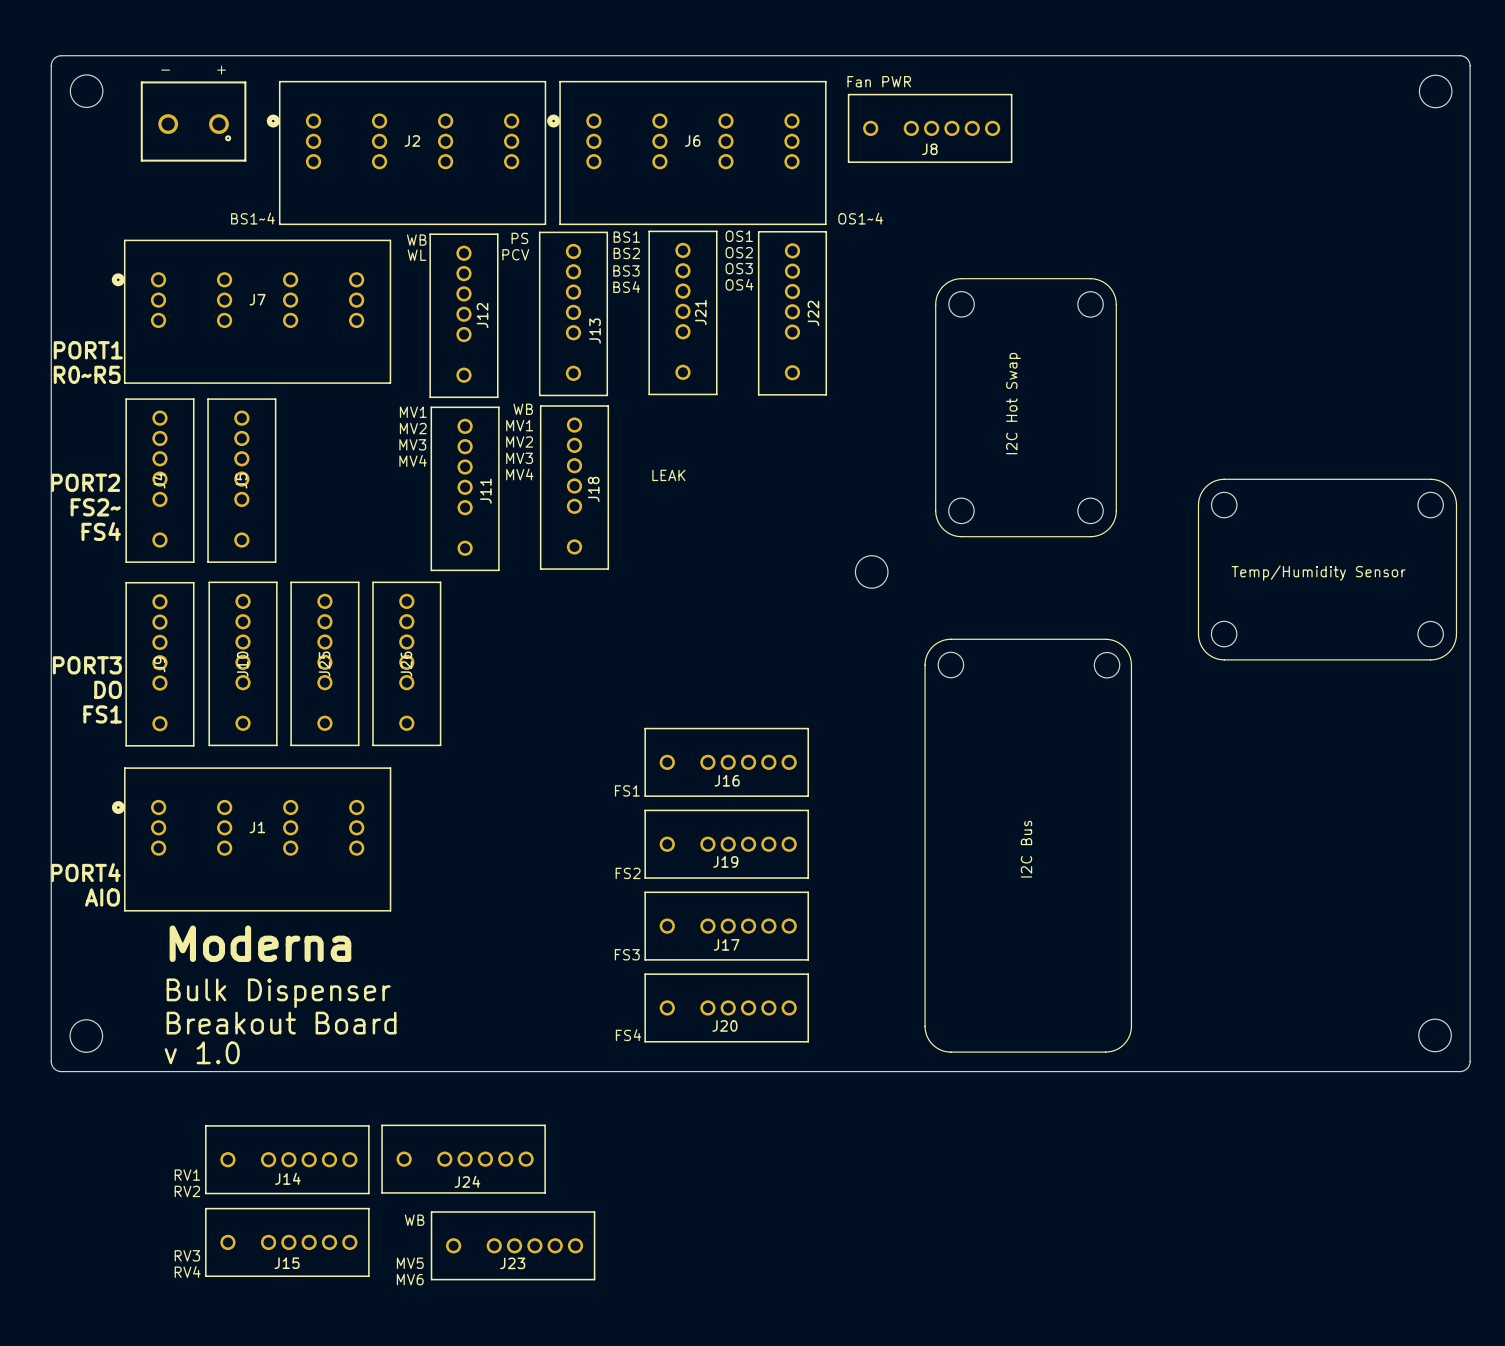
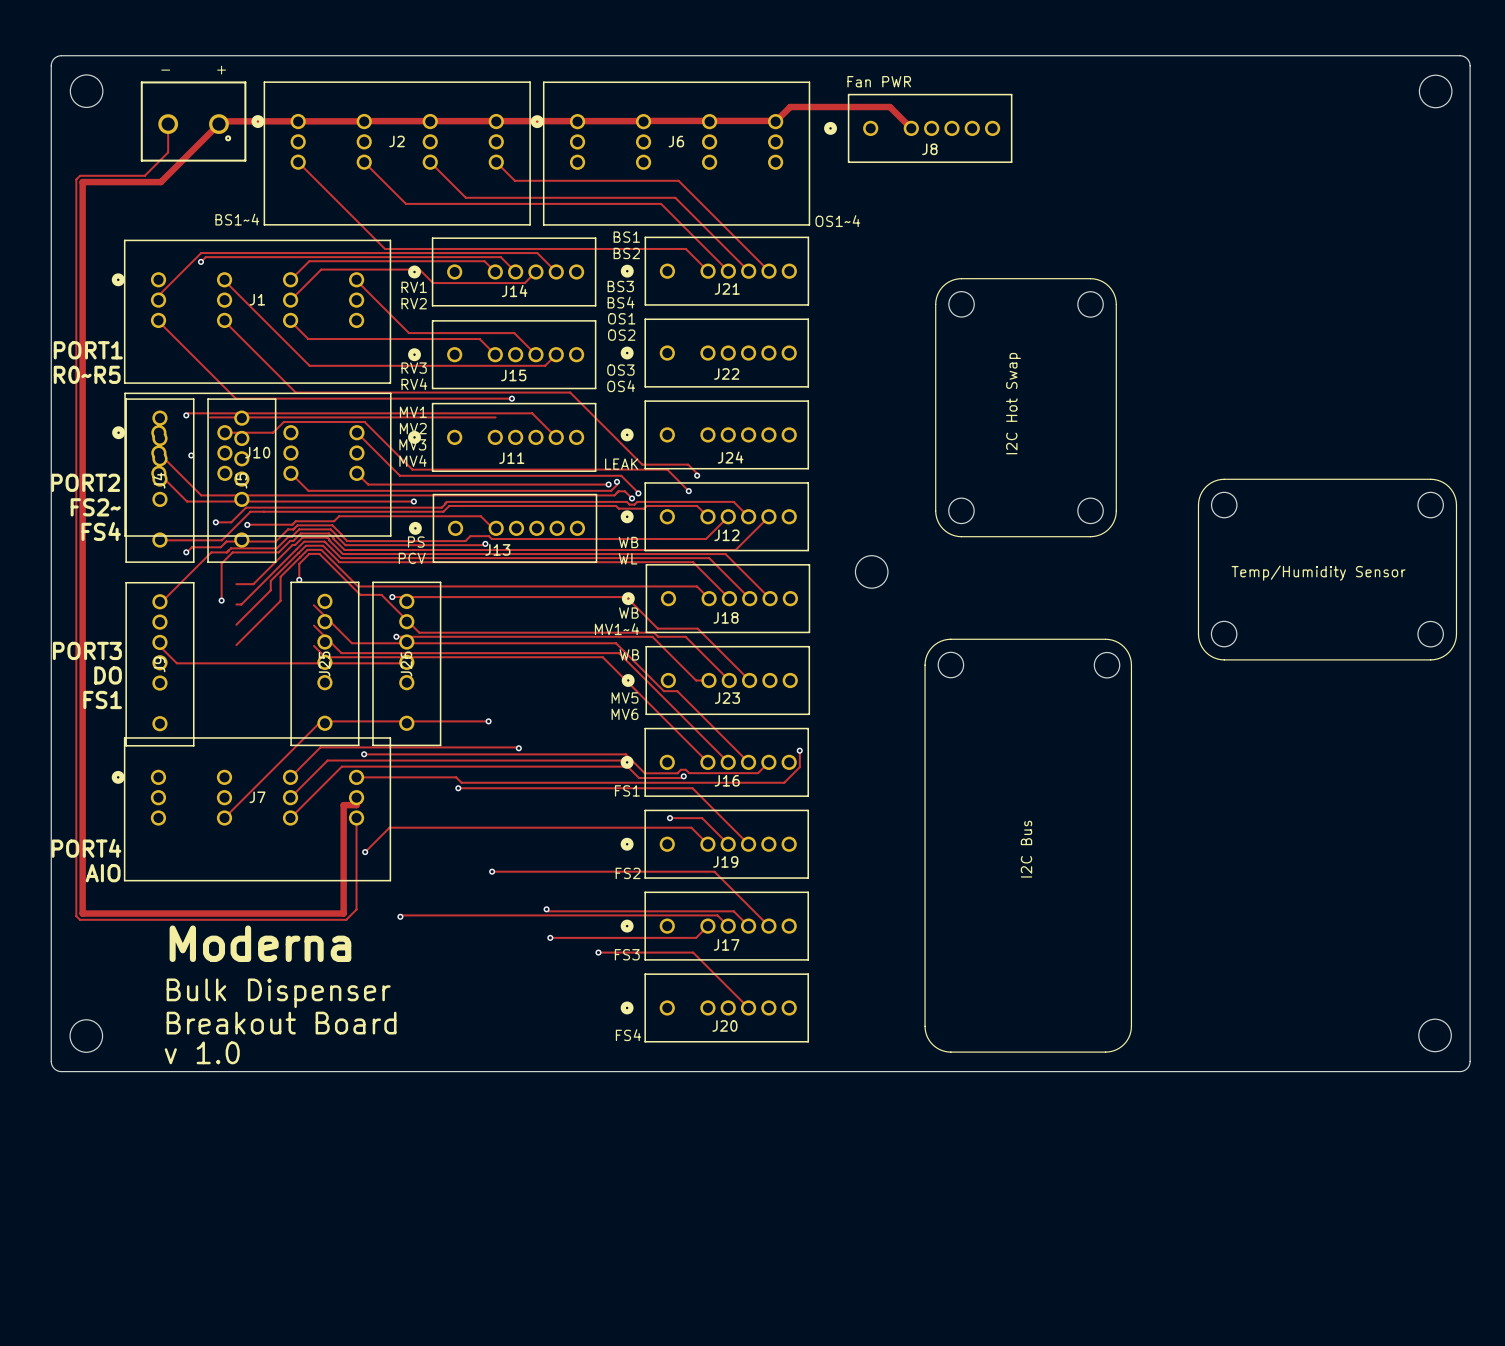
J8 footprint: [847, 93, 1013, 163] -> [824, 93, 1013, 163]
track: none -> (364, 121) (221, 121) (160, 182) (82, 182) (82, 913) (343, 913) (343, 805) (356, 805) (356, 797)
track: none -> (364, 121) (493, 121) (496, 124) (499, 121) (640, 121) (643, 124)
track: none -> (168, 124) (168, 152) (144, 175) (80, 175) (76, 179) (76, 916) (80, 919) (346, 919) (356, 909) (356, 817)
track: none -> (643, 124) (646, 120) (776, 120) (790, 107) (889, 107) (911, 128)
J2 position: (406, 152) -> (391, 153)
J6 position: (686, 152) -> (670, 153)
track: none -> (298, 162) (385, 248) (685, 248) (708, 271)
track: none -> (364, 162) (405, 203) (661, 203) (728, 271)
track: none -> (430, 162) (465, 197) (675, 197) (748, 271)
track: none -> (496, 162) (514, 180) (678, 180) (769, 271)
text position: BS1~4 (252, 218) -> BS1~4 (237, 219)
text position: OS1~4 (860, 218) -> OS1~4 (837, 221)
J21 footprint: [648, 230, 718, 396] -> [620, 236, 810, 306]
J13 footprint: [538, 231, 609, 397] -> [408, 493, 598, 563]
J22 footprint: [757, 231, 828, 396] -> [620, 318, 810, 388]
J12 footprint: [429, 233, 499, 399] -> [620, 482, 810, 552]
text position: OS1 (739, 236) -> OS1 (621, 318)
text: PS (519, 238) -> none
text: WB (416, 240) -> none
text position: OS2 (739, 252) -> OS2 (621, 335)
text: PCV (515, 254) -> none
text: WL (416, 255) -> none
track: none -> (200, 261) (205, 257) (500, 257) (515, 271)
via: none -> (200, 261)
text position: OS3 (739, 268) -> OS3 (620, 370)
text position: BS3 (626, 270) -> BS3 (620, 286)
track: none -> (495, 271) (484, 261) (309, 261) (290, 280)
track: none -> (535, 271) (524, 283) (433, 283) (419, 269) (321, 269) (290, 300)
track: none -> (556, 271) (537, 253) (201, 253) (158, 296) (158, 300)
track: none -> (224, 280) (309, 365) (545, 365) (556, 354)
track: none -> (356, 280) (408, 333) (514, 333) (535, 354)
text position: OS4 (739, 284) -> OS4 (621, 386)
text: none -> RV1 (414, 287)
text position: BS4 (626, 287) -> BS4 (621, 302)
J7 name: J7 (257, 299) -> J1 (257, 299)
text: none -> RV2 (414, 303)
J22 name position: J22 (813, 313) -> J22 (726, 373)
J12 name position: J12 (482, 315) -> J12 (726, 535)
track: none -> (158, 320) (235, 398) (511, 398)
track: none -> (224, 320) (295, 392) (570, 392) (642, 464) (688, 464) (697, 475)
track: none -> (290, 320) (308, 339) (479, 339) (495, 354)
J13 name position: J13 (595, 331) -> J13 (497, 549)
text: none -> RV3 (414, 368)
text: none -> RV4 (414, 384)
via: none -> (511, 398)
J18 footprint: [539, 405, 610, 570] -> [621, 564, 811, 634]
J11 footprint: [430, 406, 500, 572] -> [408, 402, 597, 472]
text: WB (523, 409) -> none
track: none -> (186, 415) (188, 413) (532, 413) (556, 437)
via: none -> (186, 415)
track: none -> (210, 417) (495, 417)
text: MV1 (519, 425) -> none
track: none -> (224, 432) (273, 432) (283, 422) (364, 422) (412, 469) (667, 469) (688, 491)
track: none -> (356, 432) (400, 475) (621, 475) (638, 493)
text: MV2 (519, 441) -> none
track: none -> (158, 453) (201, 495) (614, 495) (618, 491) (624, 491) (632, 498)
via: none -> (191, 455)
text: MV3 (519, 458) -> none
track: none -> (158, 473) (187, 501) (413, 501)
track: none -> (290, 473) (308, 490) (611, 490) (616, 485) (616, 481)
track: none -> (356, 473) (368, 484) (608, 484)
text: MV4 (519, 474) -> none
text position: LEAK (668, 475) -> LEAK (621, 464)
via: none -> (697, 475)
via: none -> (616, 481)
via: none -> (608, 484)
J18 name position: J18 (593, 489) -> J18 (726, 617)
J11 name position: J11 (485, 491) -> J11 (511, 458)
via: none -> (688, 491)
via: none -> (638, 493)
via: none -> (632, 498)
via: none -> (413, 501)
track: none -> (617, 501) (446, 501) (441, 507) (245, 507) (231, 522) (215, 522)
track: none -> (617, 501) (634, 504) (637, 501) (733, 501) (748, 516)
track: none -> (707, 516) (697, 505) (646, 505) (644, 508) (618, 508) (616, 505) (449, 505) (443, 511) (250, 511) (221, 540) (158, 540)
track: none -> (728, 516) (706, 539) (491, 539) (488, 536) (470, 536) (465, 541) (347, 541) (332, 525) (297, 525) (293, 529) (287, 529) (275, 541) (226, 541) (220, 547) (191, 547) (186, 552)
track: none -> (768, 516) (735, 549) (344, 549) (329, 533) (300, 533) (278, 552) (232, 552) (221, 563) (221, 600)
via: none -> (215, 522)
track: none -> (247, 524) (292, 524) (295, 521) (334, 521) (339, 516) (480, 516) (492, 527)
via: none -> (247, 524)
text: none -> PS (416, 542)
text: none -> WB (628, 542)
track: none -> (485, 543) (345, 545) (330, 529) (299, 529) (276, 548) (230, 548) (226, 552) (211, 552) (158, 604)
via: none -> (485, 543)
via: none -> (186, 552)
text: none -> PCV (412, 558)
text: none -> WL (628, 558)
track: none -> (299, 579) (299, 563) (309, 553) (319, 553) (360, 594) (381, 594) (419, 632) (654, 632) (658, 636) (685, 636) (729, 680)
via: none -> (299, 579)
J10 footprint: [208, 581, 278, 747] -> [112, 392, 392, 537]
track: none -> (236, 584) (253, 584) (302, 537) (327, 537) (342, 554) (725, 554) (770, 598)
track: none -> (392, 597) (626, 597) (657, 628) (697, 628) (749, 680)
via: none -> (392, 597)
track: none -> (709, 598) (696, 586) (357, 586) (321, 549) (307, 549) (280, 576) (280, 600) (236, 645)
track: none -> (729, 598) (693, 562) (339, 562) (323, 545) (305, 545) (270, 580) (270, 590) (236, 624)
track: none -> (749, 598) (709, 558) (341, 558) (324, 541) (304, 541) (241, 604) (236, 604)
via: none -> (221, 600)
track: none -> (313, 605) (351, 643) (616, 643) (663, 691) (677, 691) (748, 762)
text: none -> WB (628, 613)
track: none -> (313, 625) (341, 653) (619, 653) (728, 762)
text: none -> MV1~4 (617, 629)
track: none -> (396, 636) (652, 636) (696, 680) (708, 680)
via: none -> (396, 636)
track: none -> (158, 645) (176, 663) (405, 663)
track: none -> (313, 645) (325, 657) (602, 657) (707, 762)
text: none -> WB (629, 654)
text position: PORT3 (87, 665) -> PORT3 (87, 650)
text position: DO (108, 689) -> DO (108, 675)
text: none -> MV5 (625, 697)
text position: FS1 (102, 714) -> FS1 (102, 699)
text: none -> MV6 (625, 714)
track: none -> (488, 721) (321, 721) (224, 817)
via: none -> (488, 721)
J16 footprint: [644, 727, 810, 797] -> [620, 727, 810, 797]
track: none -> (518, 748) (320, 747) (290, 777)
via: none -> (518, 748)
track: none -> (799, 750) (799, 767) (784, 782) (461, 782) (456, 777) (356, 777)
via: none -> (799, 750)
track: none -> (364, 754) (625, 754) (644, 773) (677, 773) (680, 769) (685, 769) (689, 773) (758, 773) (768, 762)
via: none -> (364, 754)
track: none -> (623, 760) (327, 760) (290, 797)
track: none -> (683, 776) (682, 778) (639, 778) (627, 766) (341, 766) (290, 817)
via: none -> (683, 776)
track: none -> (458, 788) (692, 788) (748, 844)
via: none -> (458, 788)
J7: none -> (251, 809)
J19 footprint: [644, 809, 810, 879] -> [620, 809, 810, 879]
track: none -> (669, 818) (702, 818) (728, 844)
via: none -> (669, 818)
J1: (251, 839) -> none
track: none -> (707, 844) (691, 827) (389, 827) (365, 852)
text: none -> PORT4 (86, 848)
via: none -> (365, 852)
track: none -> (492, 871) (714, 871) (768, 926)
via: none -> (492, 871)
text: PORT4 (85, 872) -> AIO (103, 873)
J17 footprint: [644, 891, 810, 961] -> [620, 891, 810, 961]
text: AIO (102, 897) -> none
track: none -> (546, 909) (548, 911) (733, 911) (748, 926)
via: none -> (546, 909)
track: none -> (400, 916) (717, 915) (728, 926)
via: none -> (400, 916)
track: none -> (707, 926) (696, 937) (550, 937)
via: none -> (550, 937)
track: none -> (598, 952) (693, 952) (748, 1007)
via: none -> (598, 952)
J20 footprint: [644, 973, 810, 1043] -> [620, 973, 810, 1043]
J24 footprint: [381, 1124, 546, 1194] -> [620, 400, 810, 470]
J14 footprint: [205, 1125, 370, 1195] -> [408, 237, 597, 307]
text: RV1 (187, 1175) -> none
text: RV2 (187, 1191) -> none
J15 footprint: [205, 1207, 370, 1278] -> [408, 320, 597, 390]
J23 footprint: [430, 1211, 596, 1281] -> [621, 645, 811, 716]
text: WB (414, 1220) -> none
text: RV3 (187, 1255) -> none
text: MV5 (410, 1263) -> none
text: RV4 (187, 1271) -> none
text: MV6 (410, 1279) -> none

